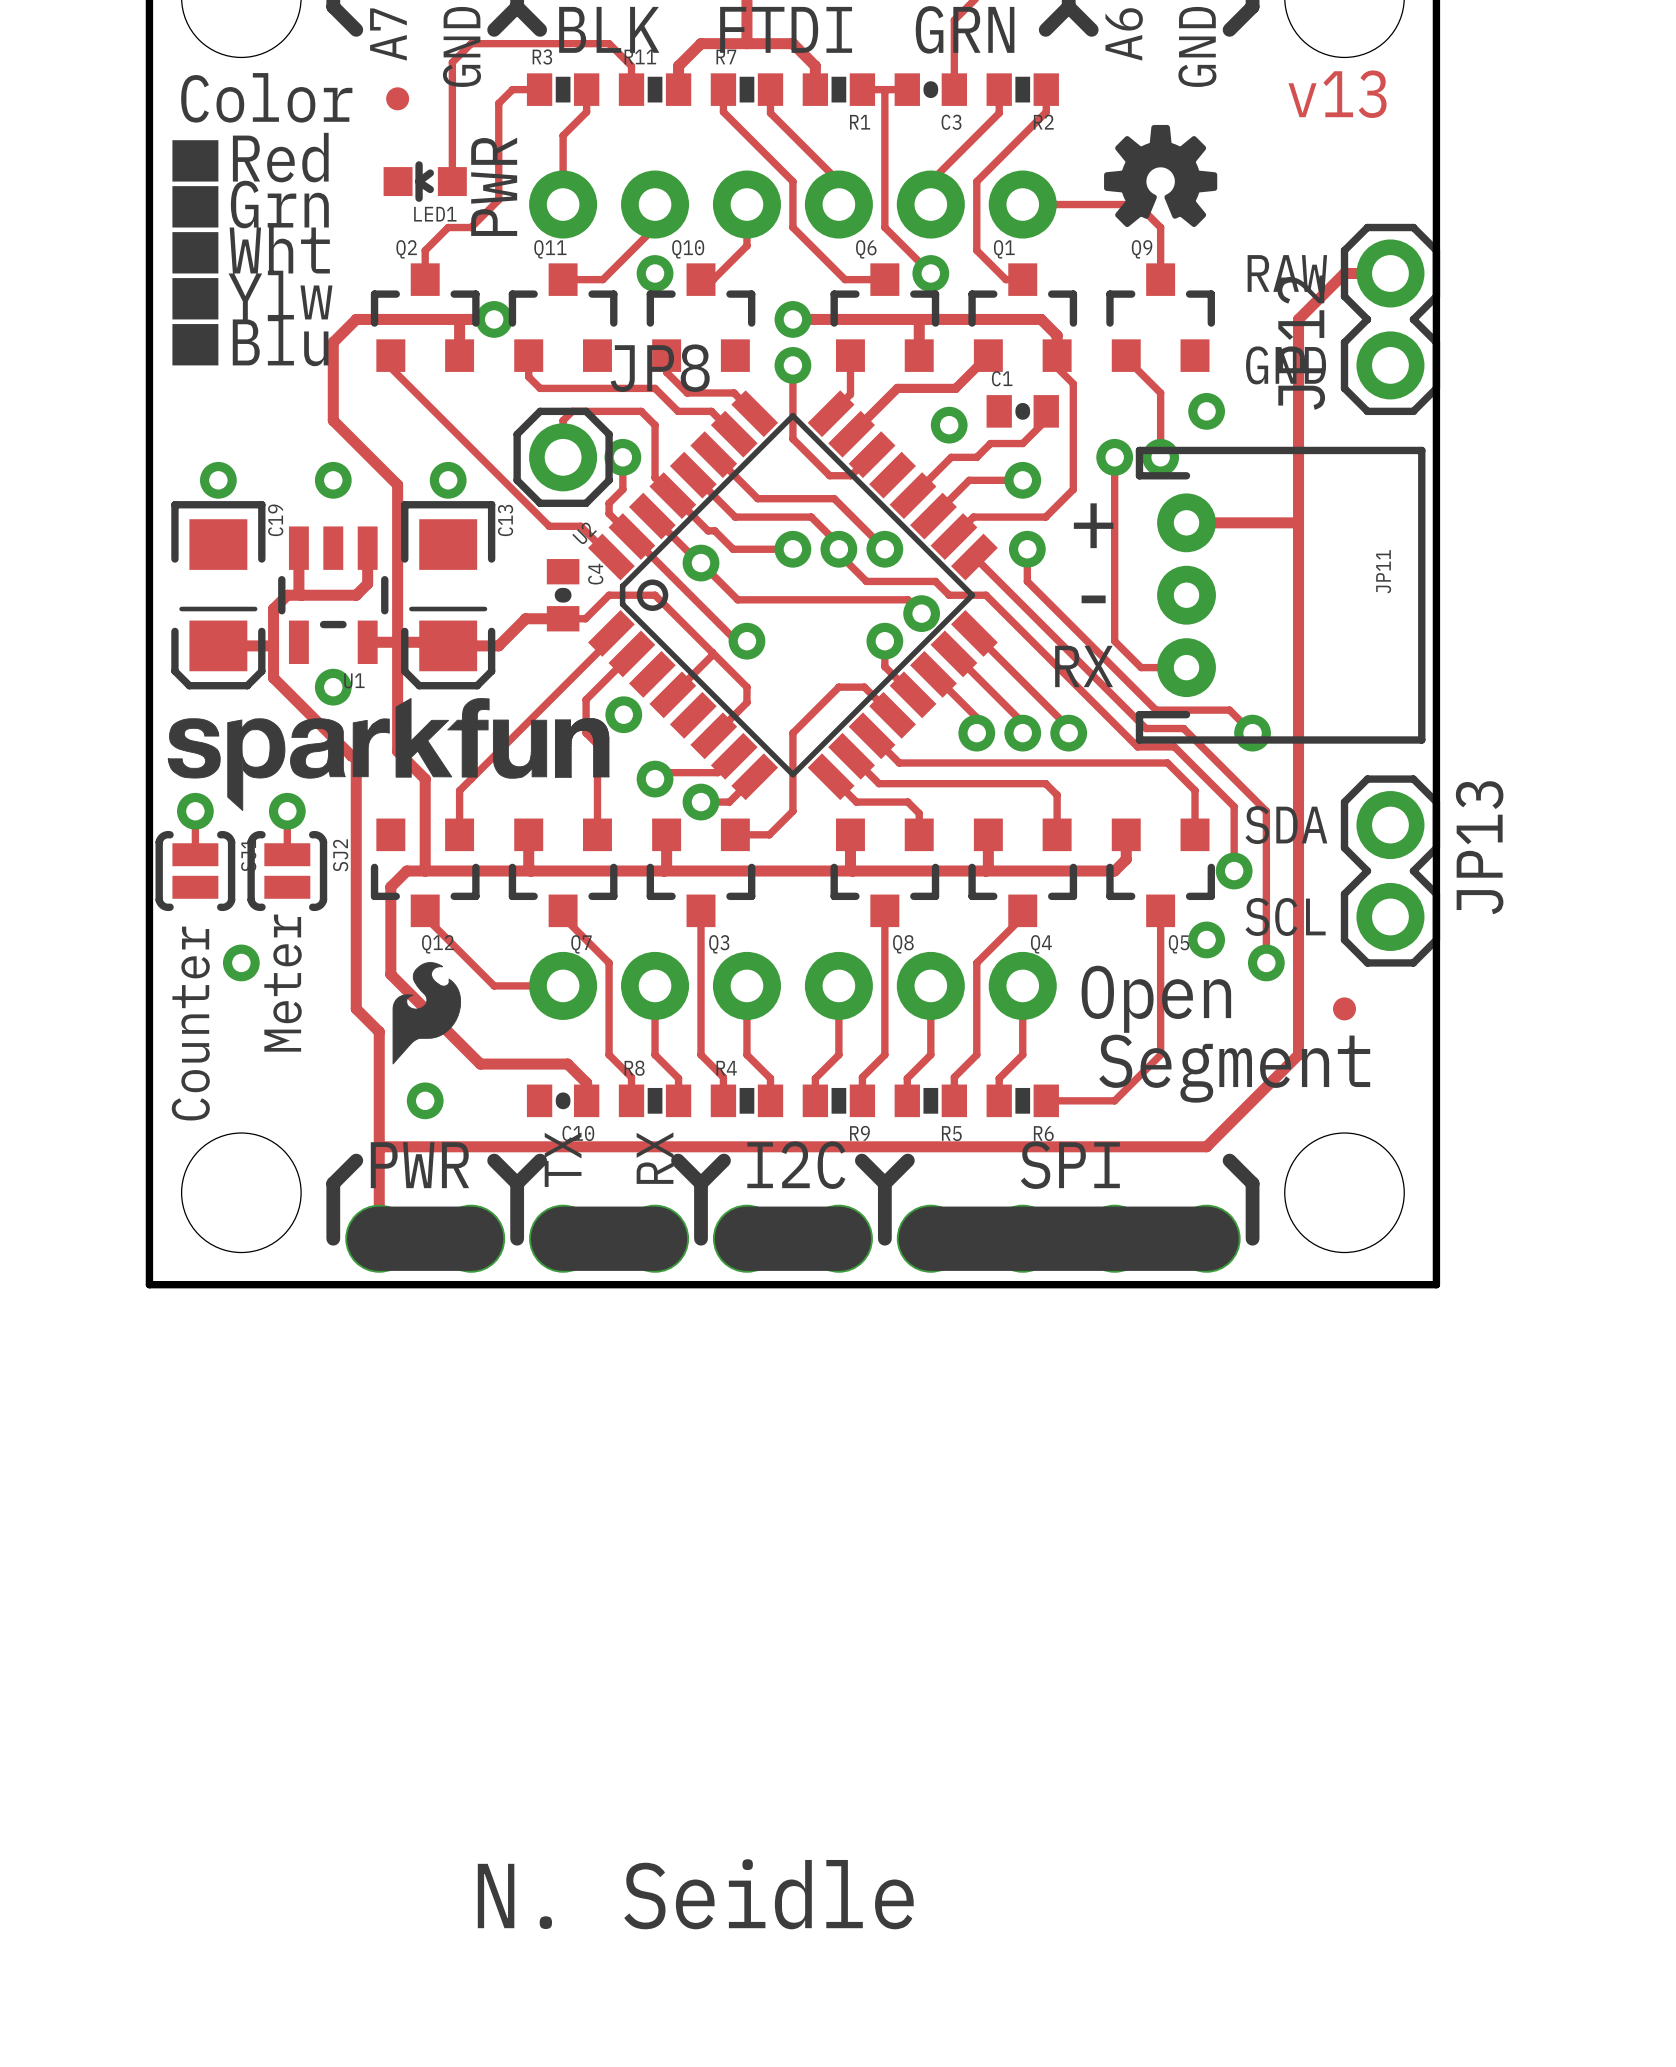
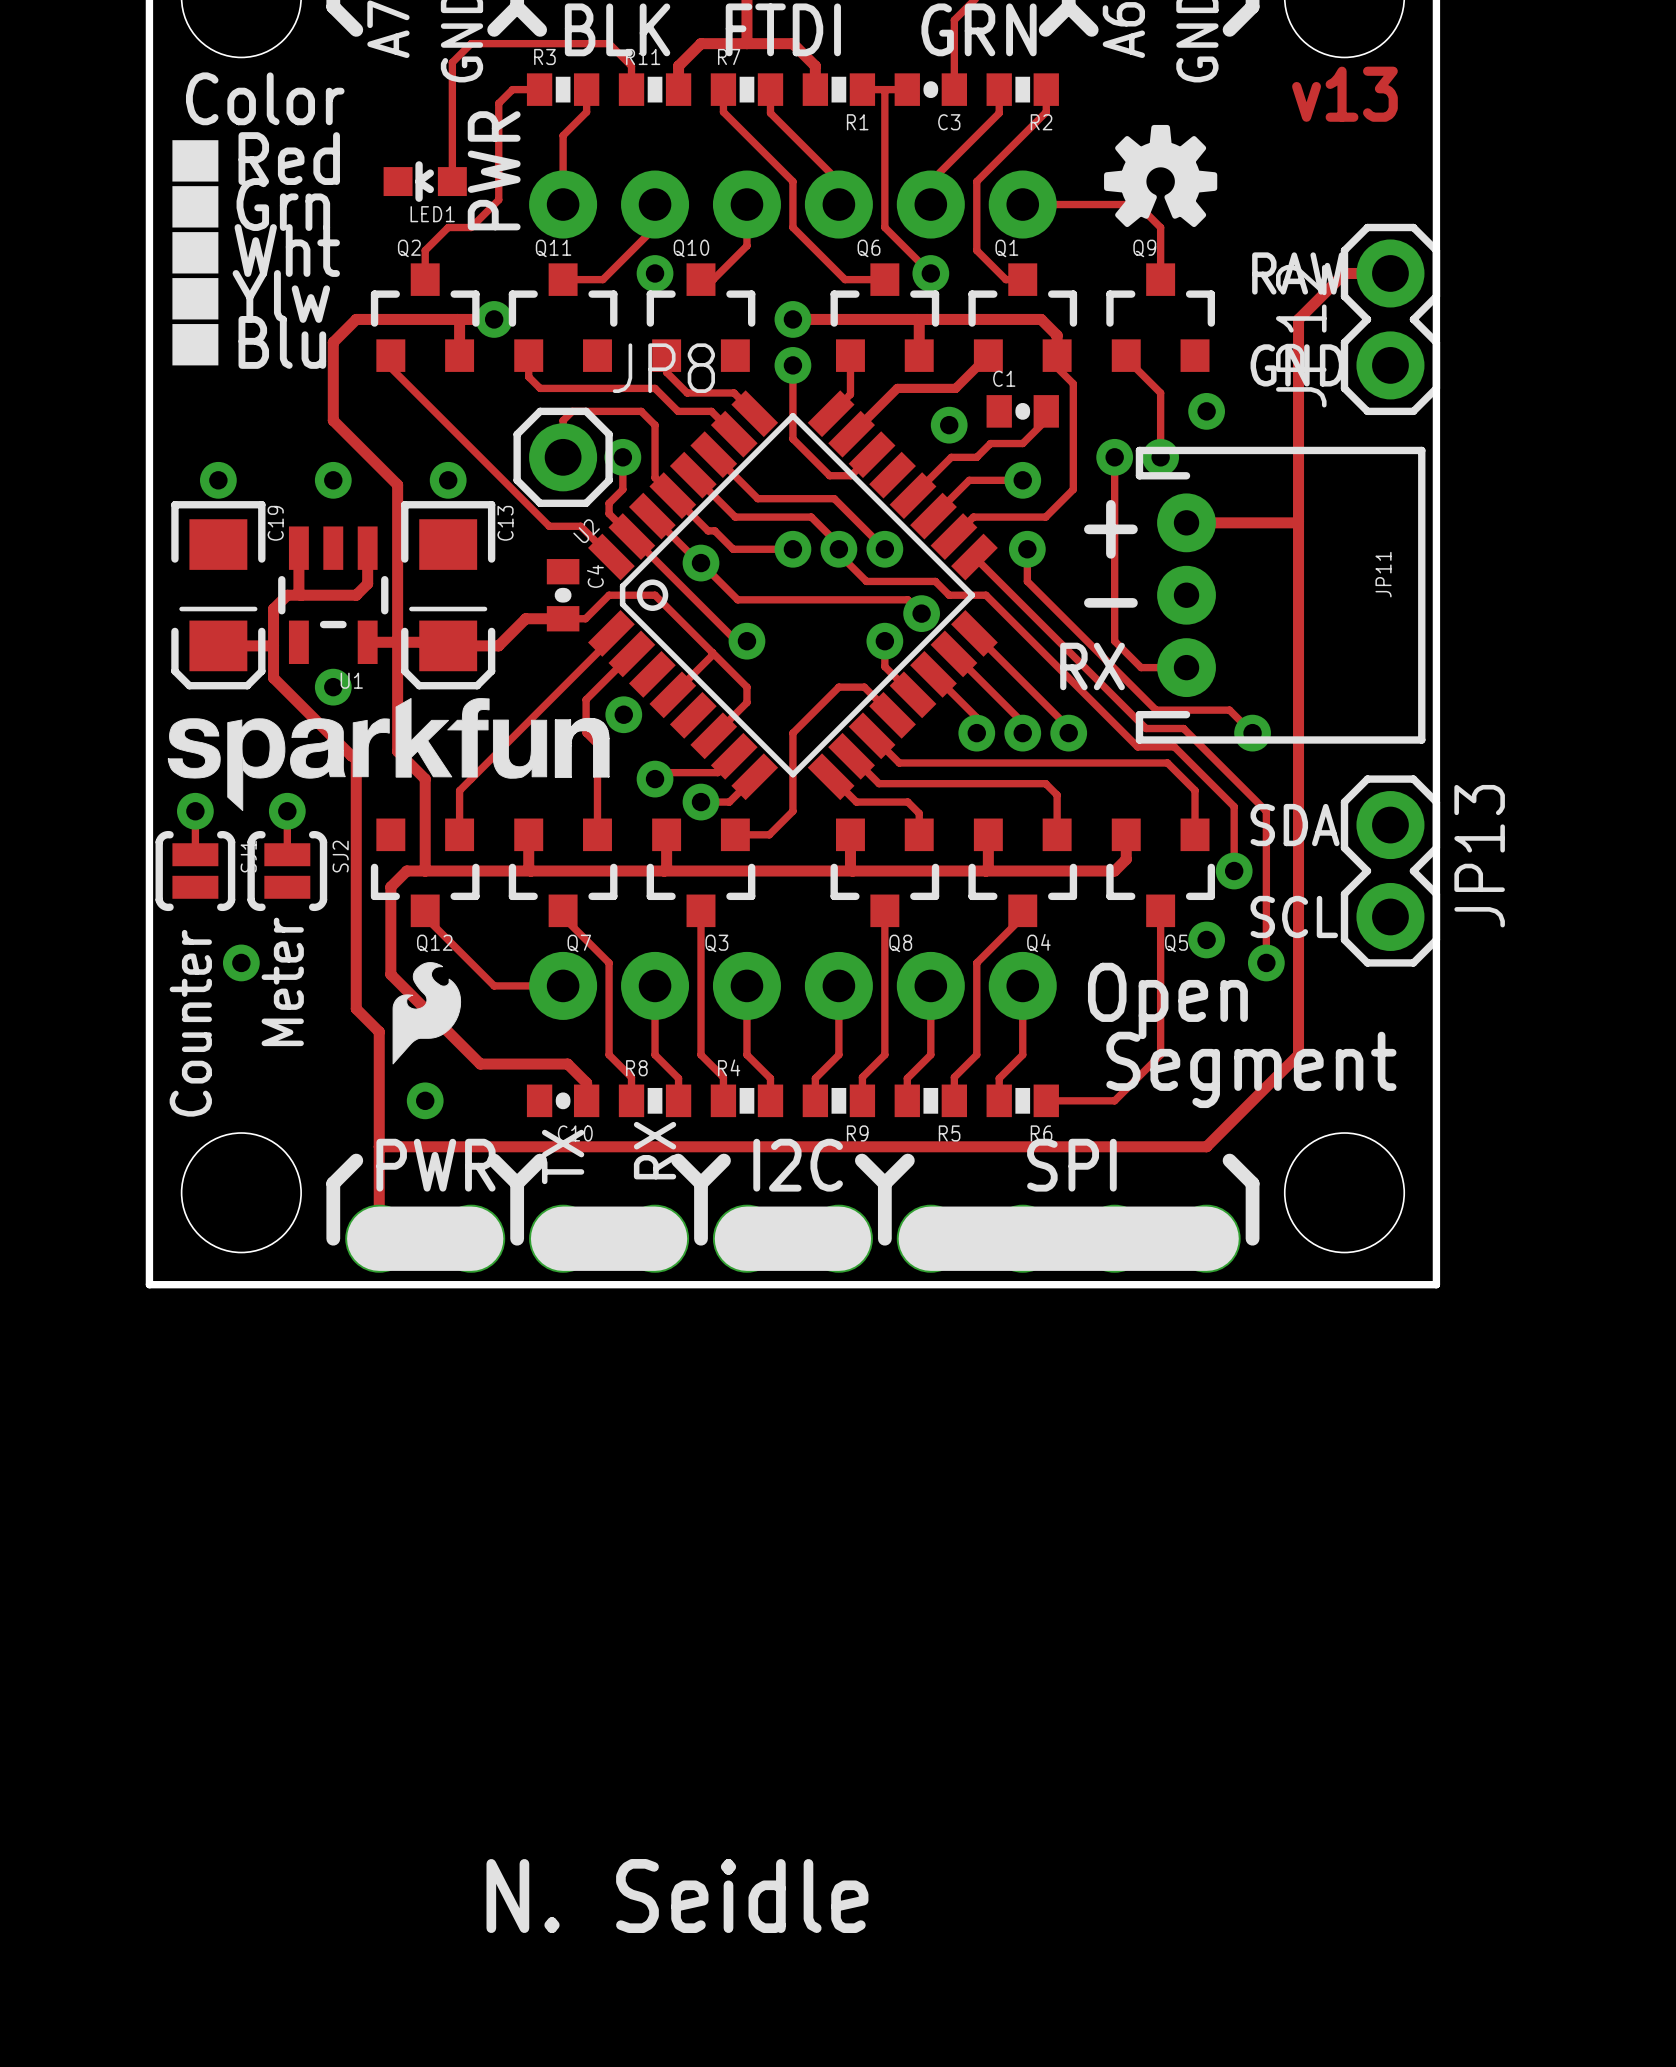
part: (397, 98) -> none
part: (1344, 1008) -> none

